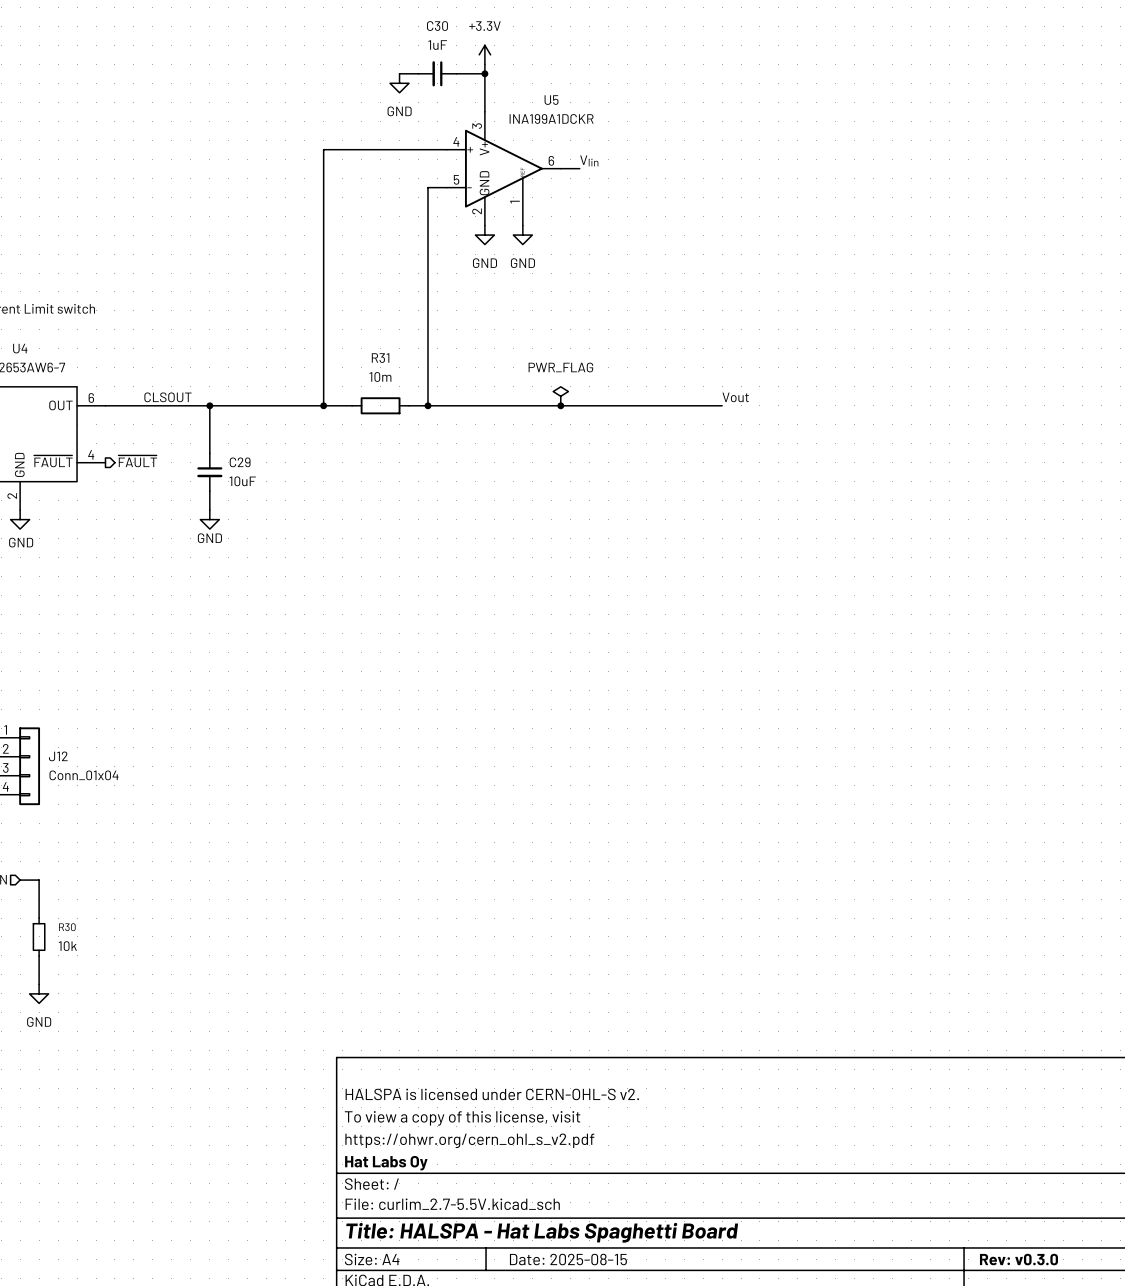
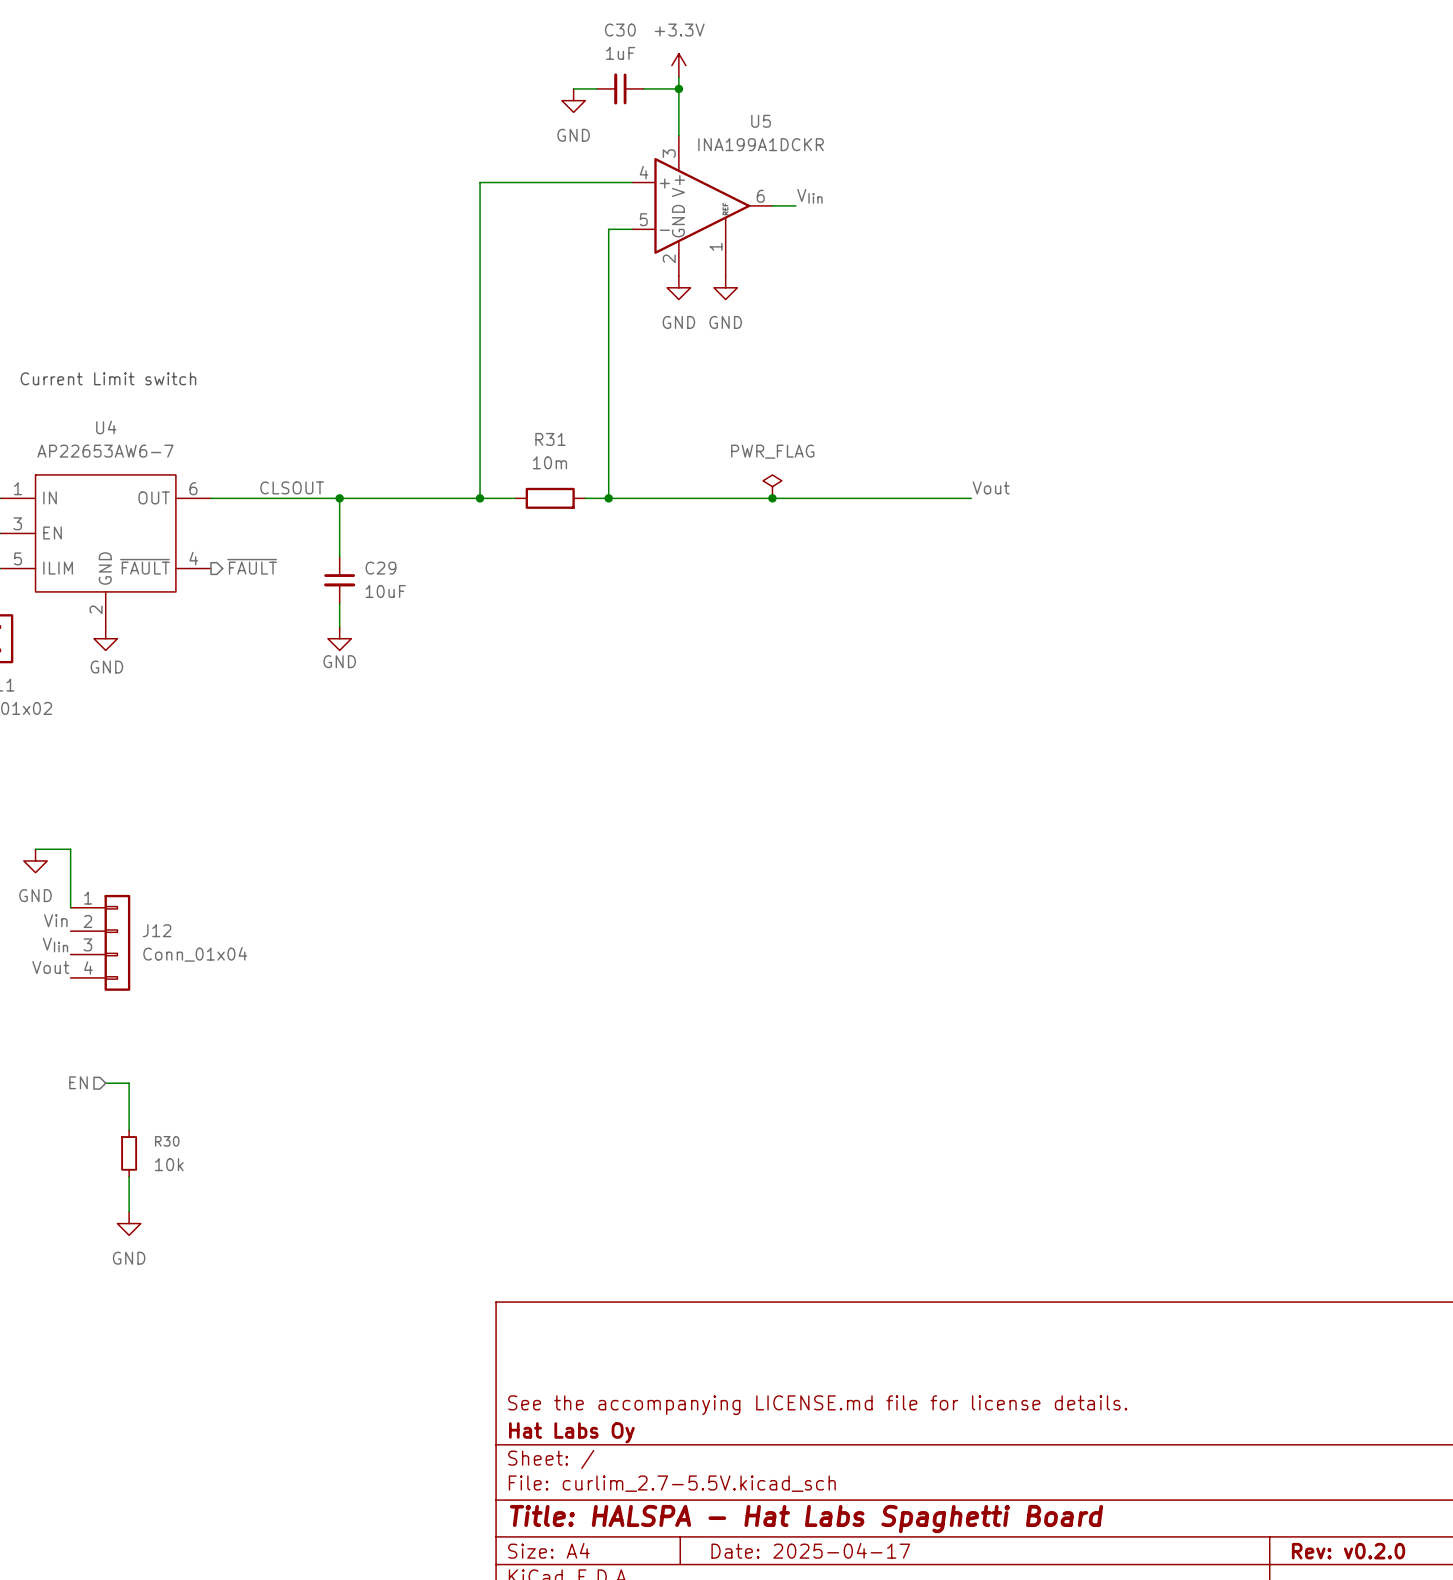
title block: HALSPA is licensed under CERN-OHL-S v2. (492, 1094) -> none
title block: To view a copy of this license, visit (462, 1118) -> none
title block: https://ohwr.org/cern_ohl_s_v2.pdf (469, 1140) -> See the accompanying LICENSE.md file for license details. (817, 1405)
title block: Date: 2025-08-15 (568, 1259) -> Date: 2025-04-17 (810, 1550)
title block: Rev: v0.3.0 (1018, 1259) -> Rev: v0.2.0 (1348, 1551)

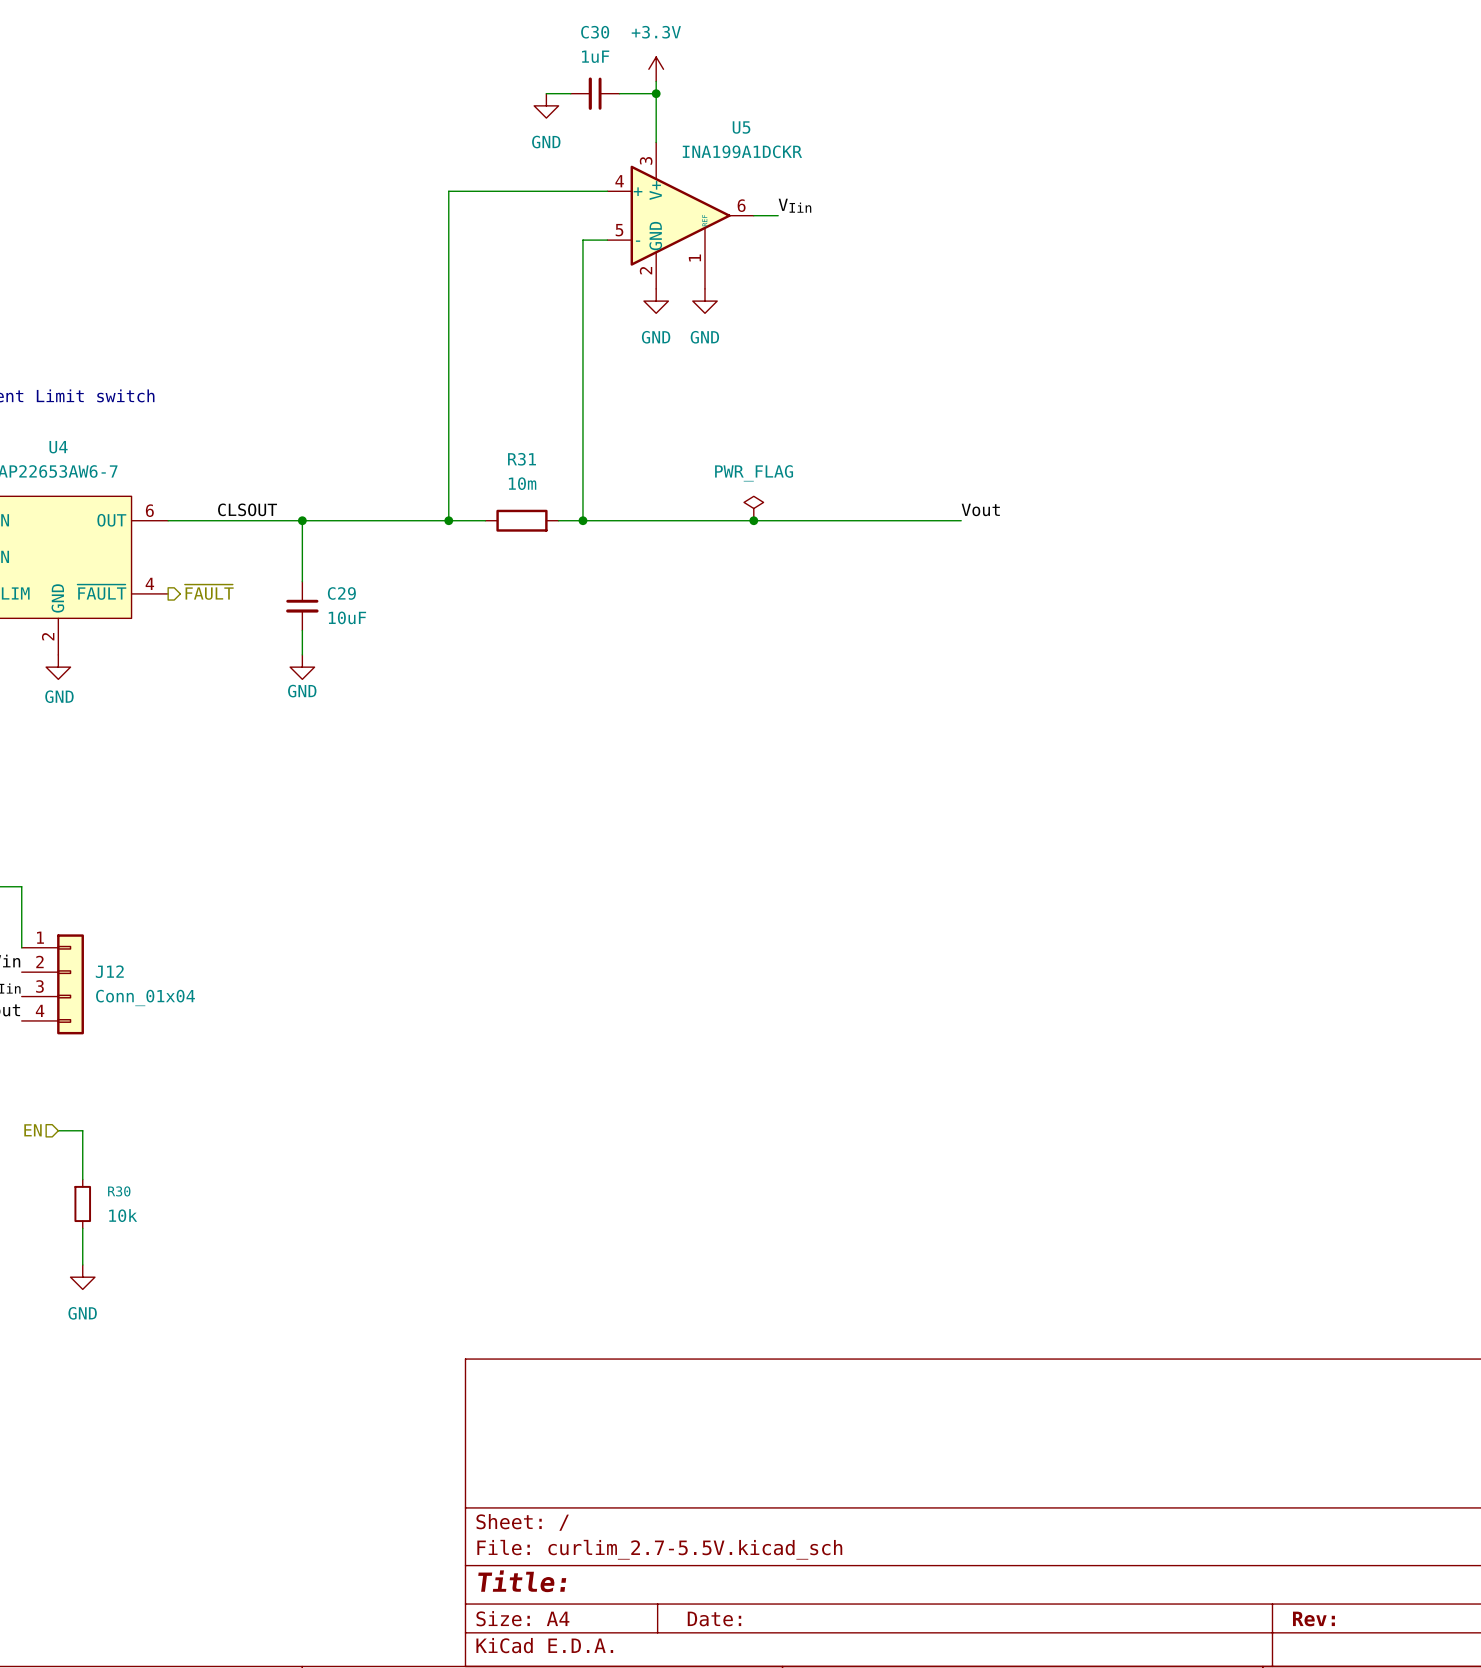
title block: See the accompanying LICENSE.md file for license details. (817, 1405) -> none
title block: Hat Labs Oy (571, 1432) -> none
title block: Title: HALSPA - Hat Labs Spaghetti Board (806, 1519) -> Title: (522, 1581)
title block: Date: 2025-04-17 (810, 1550) -> Date: (714, 1618)
title block: Rev: v0.2.0 (1348, 1551) -> Rev: (1313, 1618)

